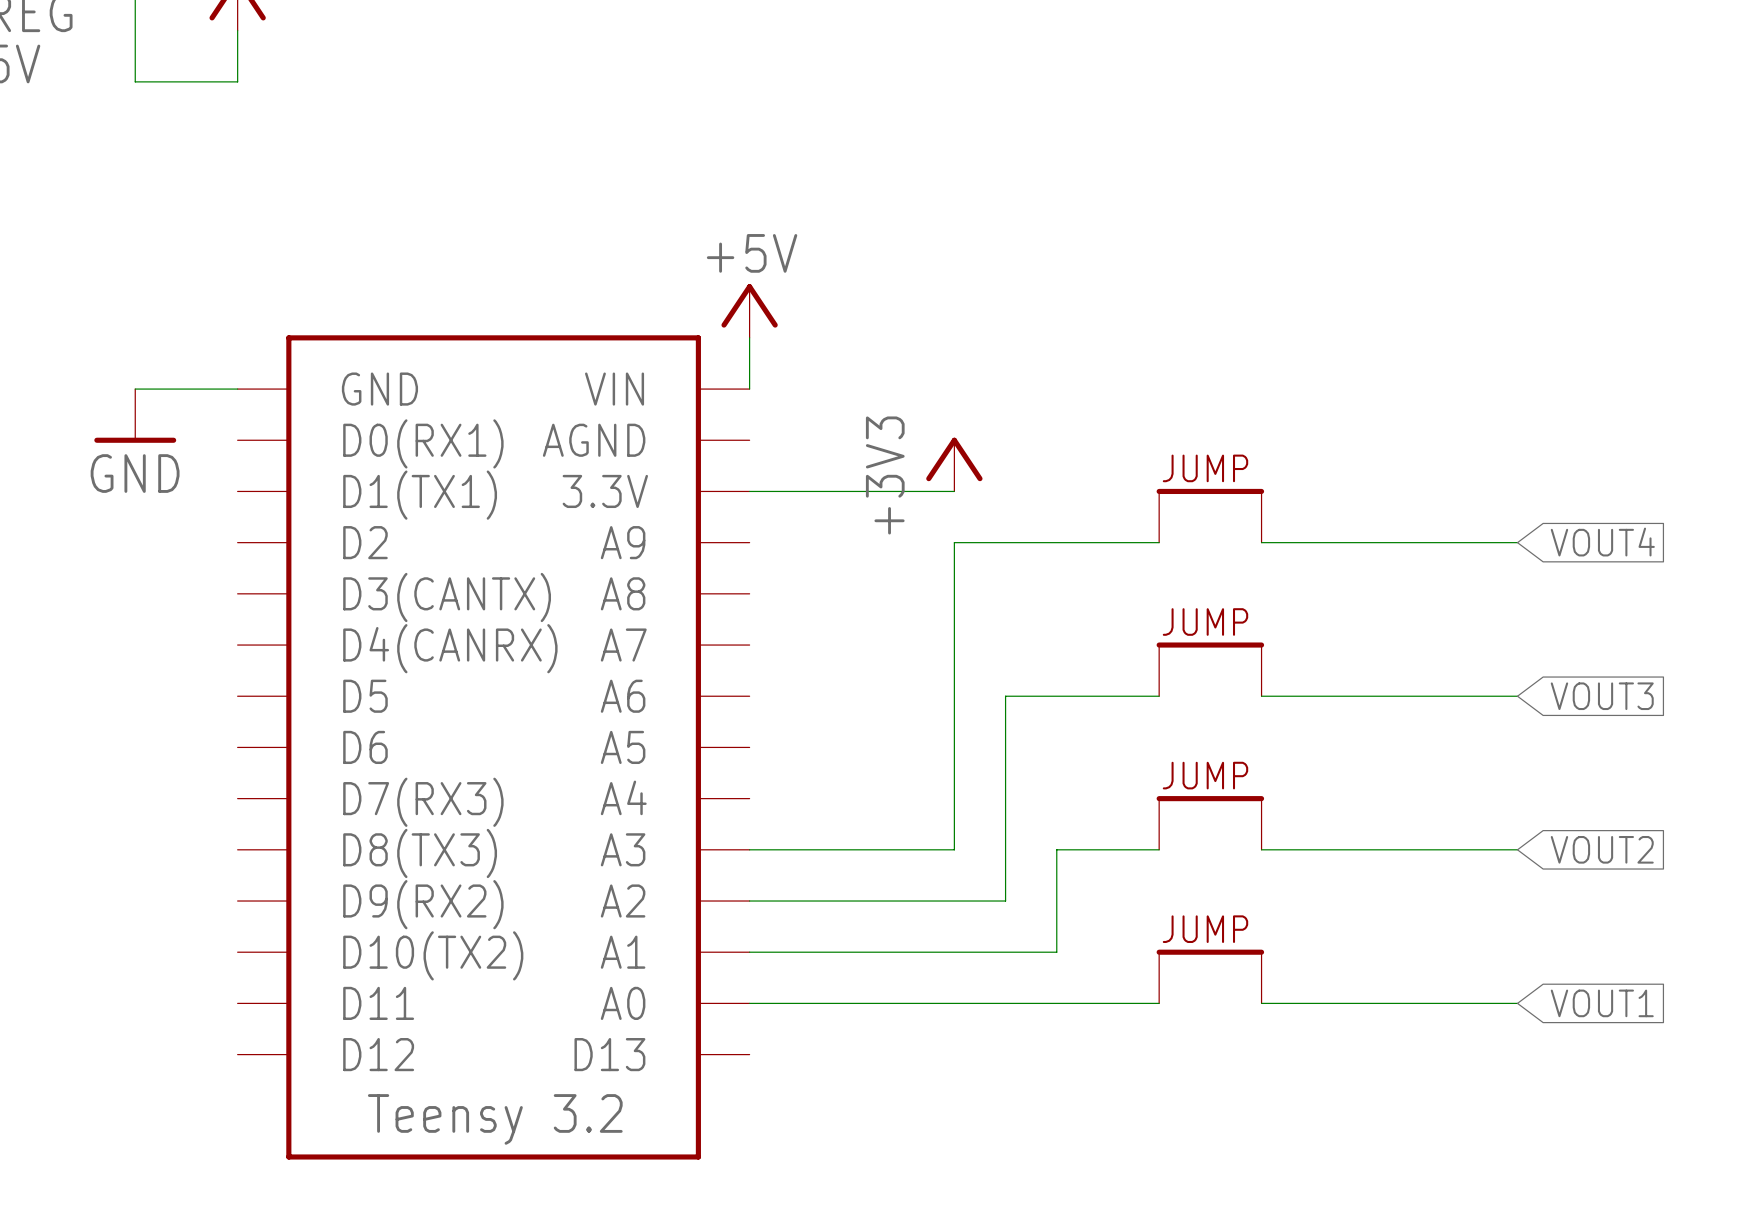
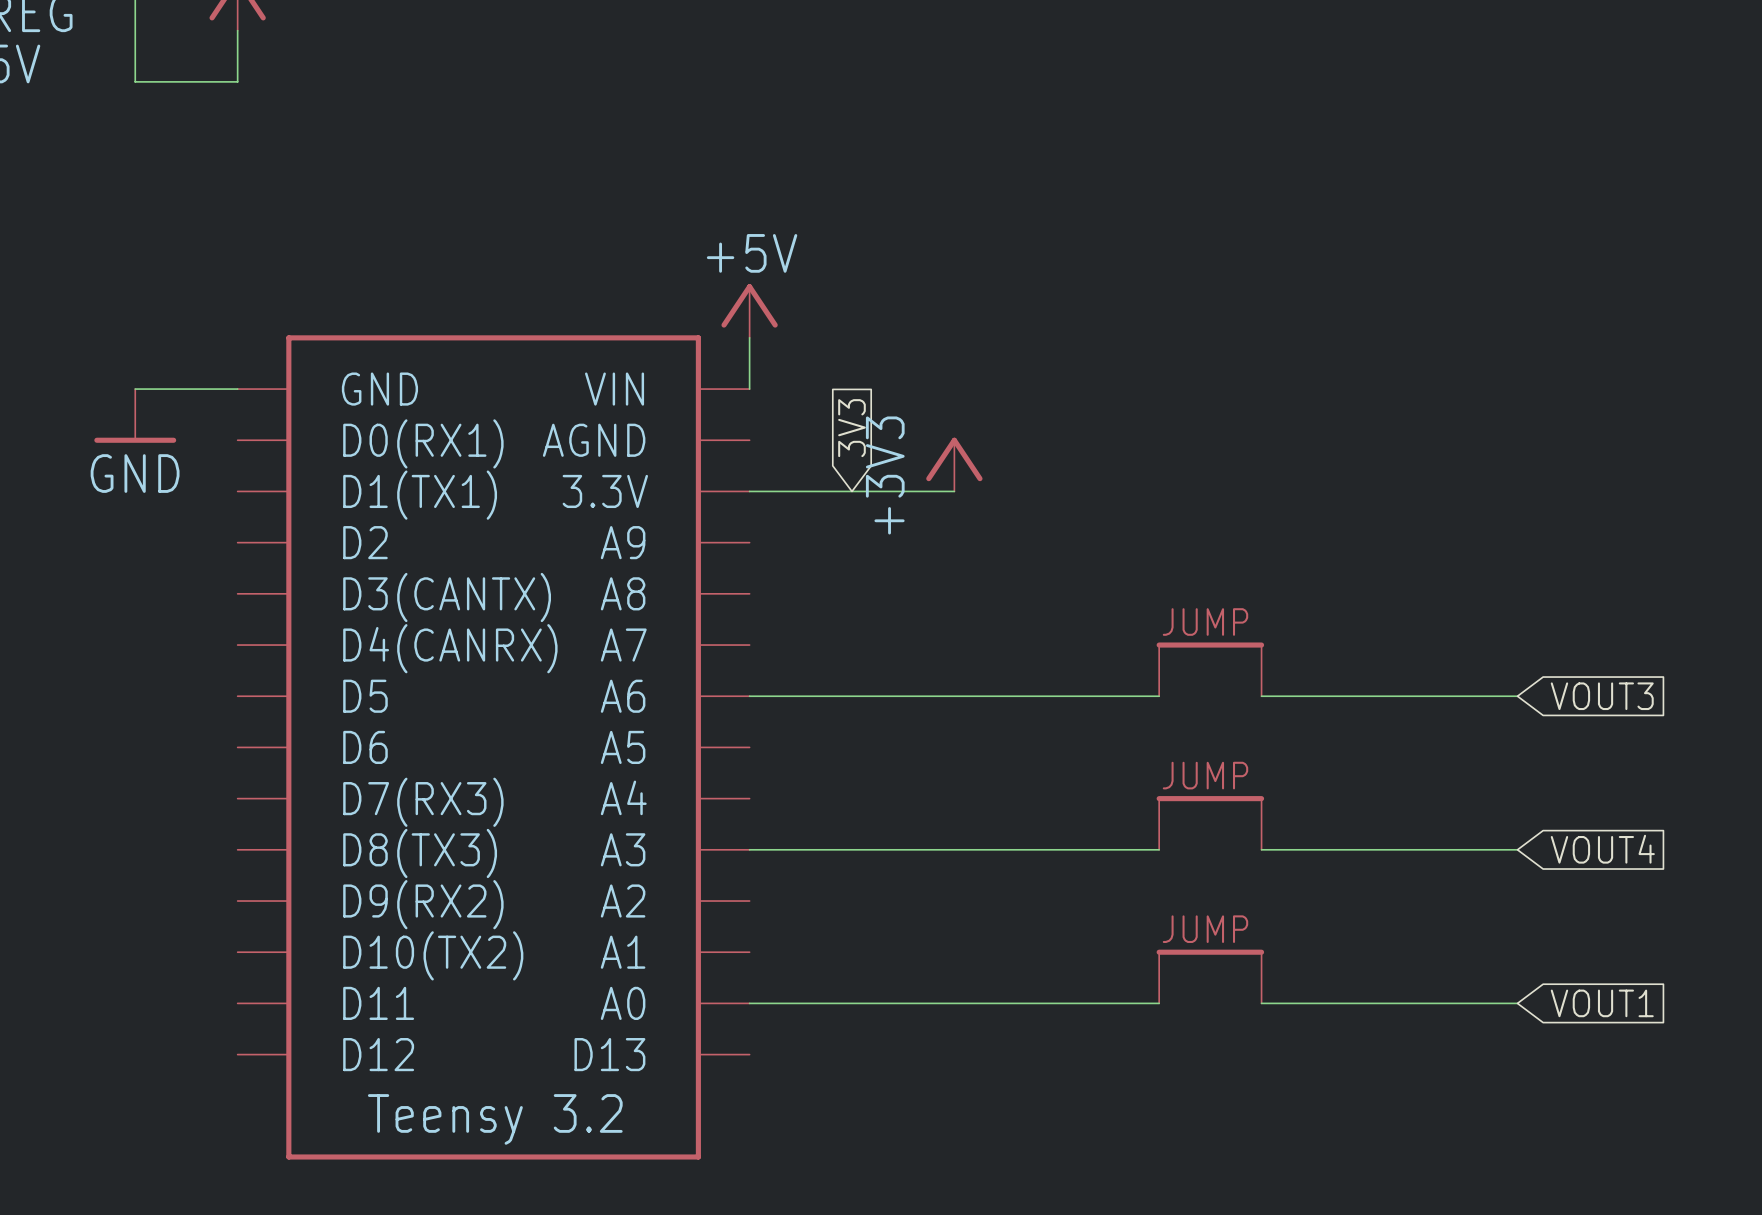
global label: none -> 3V3 (851, 428)
part: (1210, 515) -> none
wire: (1159, 542) (954, 542) (954, 849) -> none
wire: (1261, 542) (1517, 542) -> none
global label: VOUT4 (1602, 542) -> none
wire: (1005, 696) (1005, 901) (749, 901) -> (1005, 696) (749, 696)
wire: (1056, 849) (1056, 952) (749, 952) -> (1056, 849) (954, 849)
global label: VOUT2 (1602, 849) -> VOUT4 (1602, 849)

